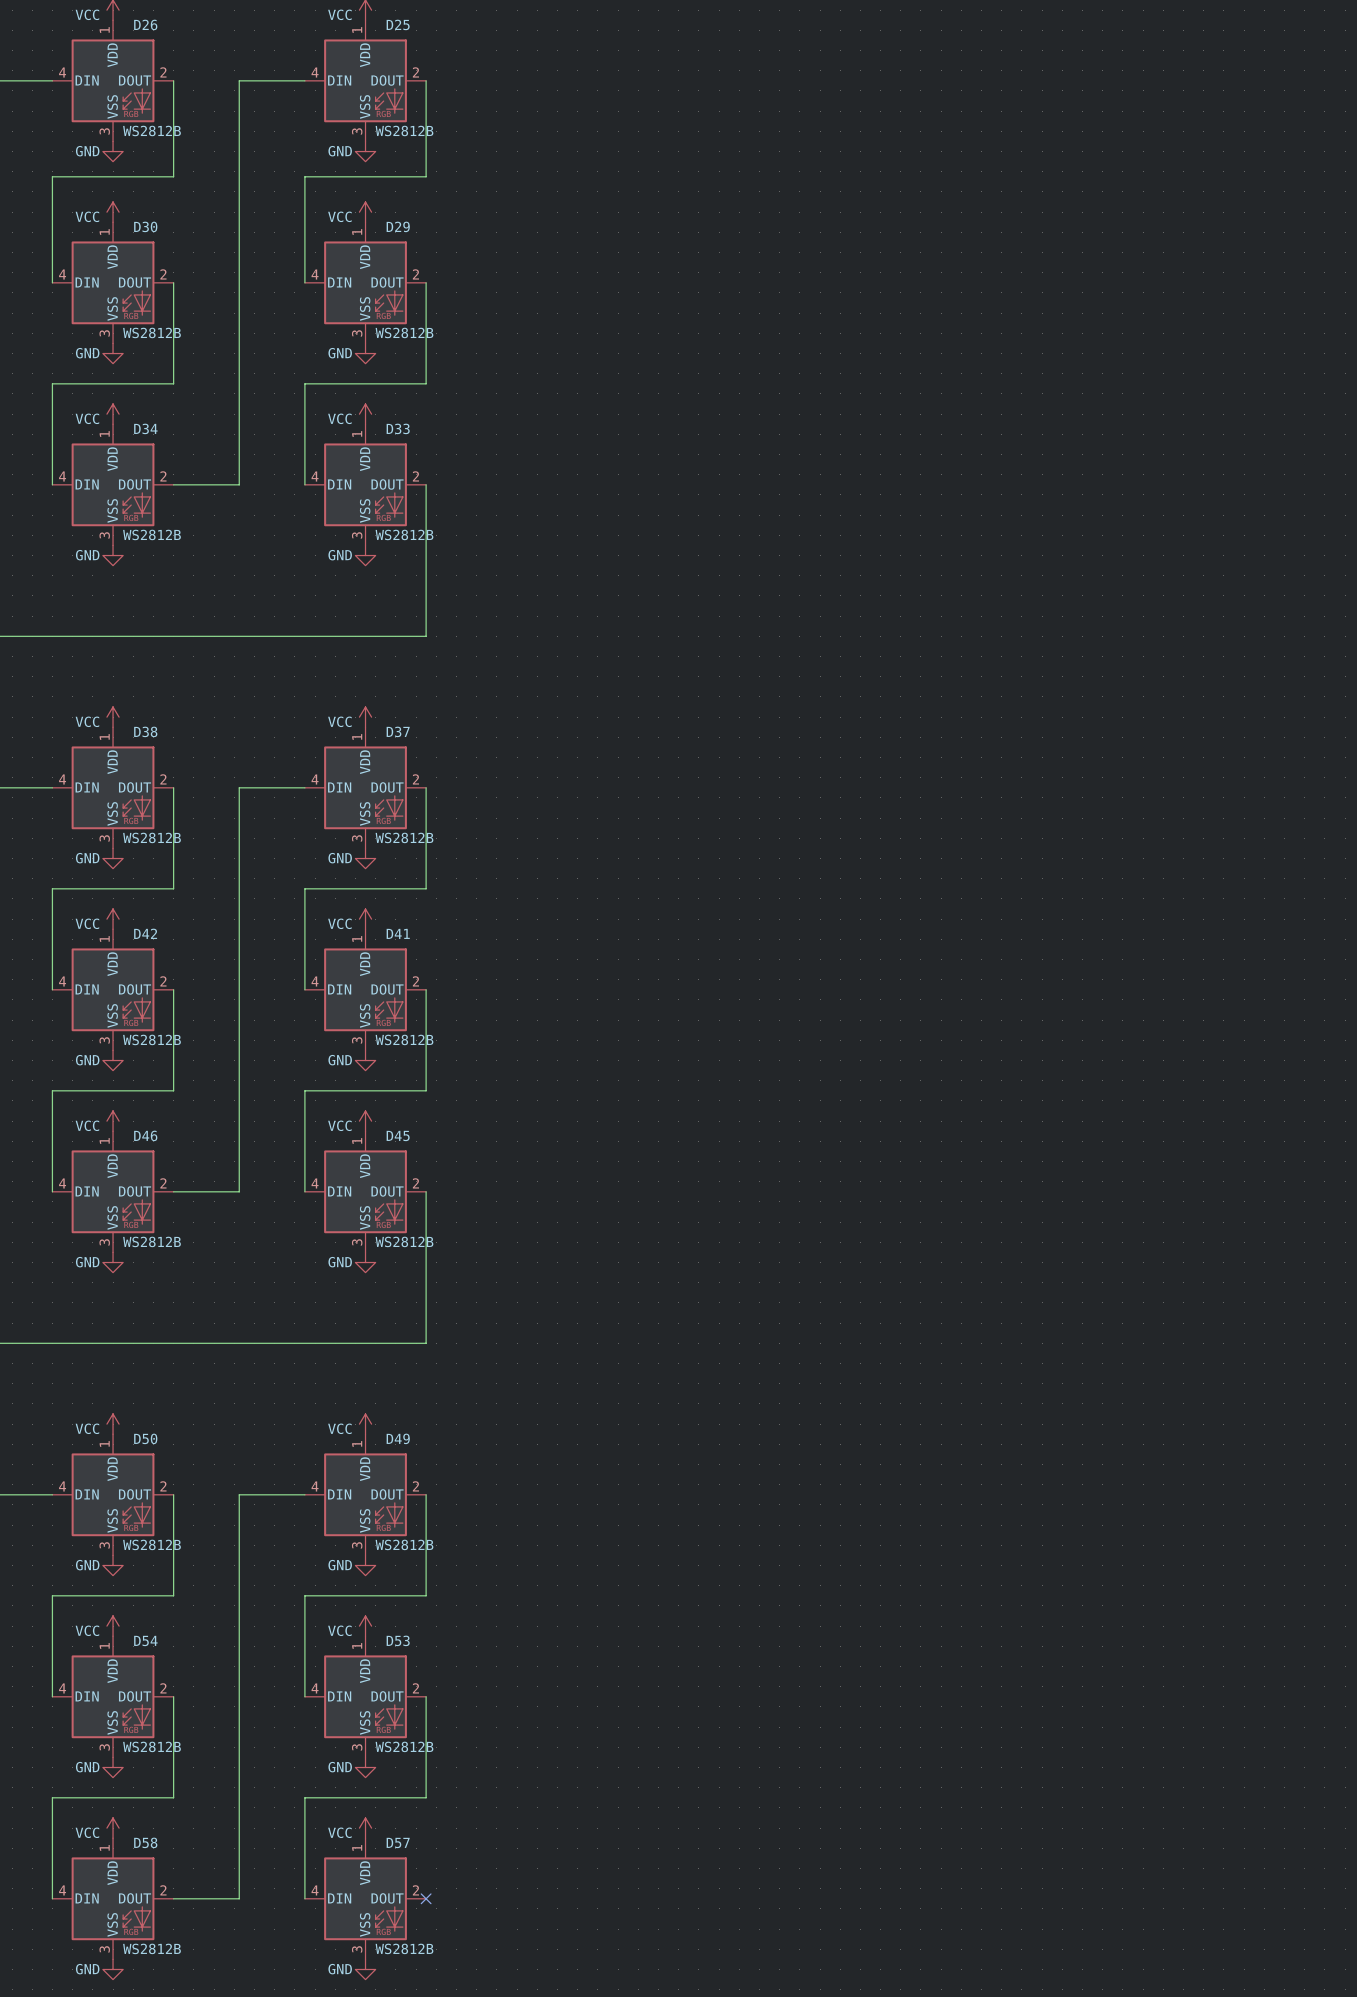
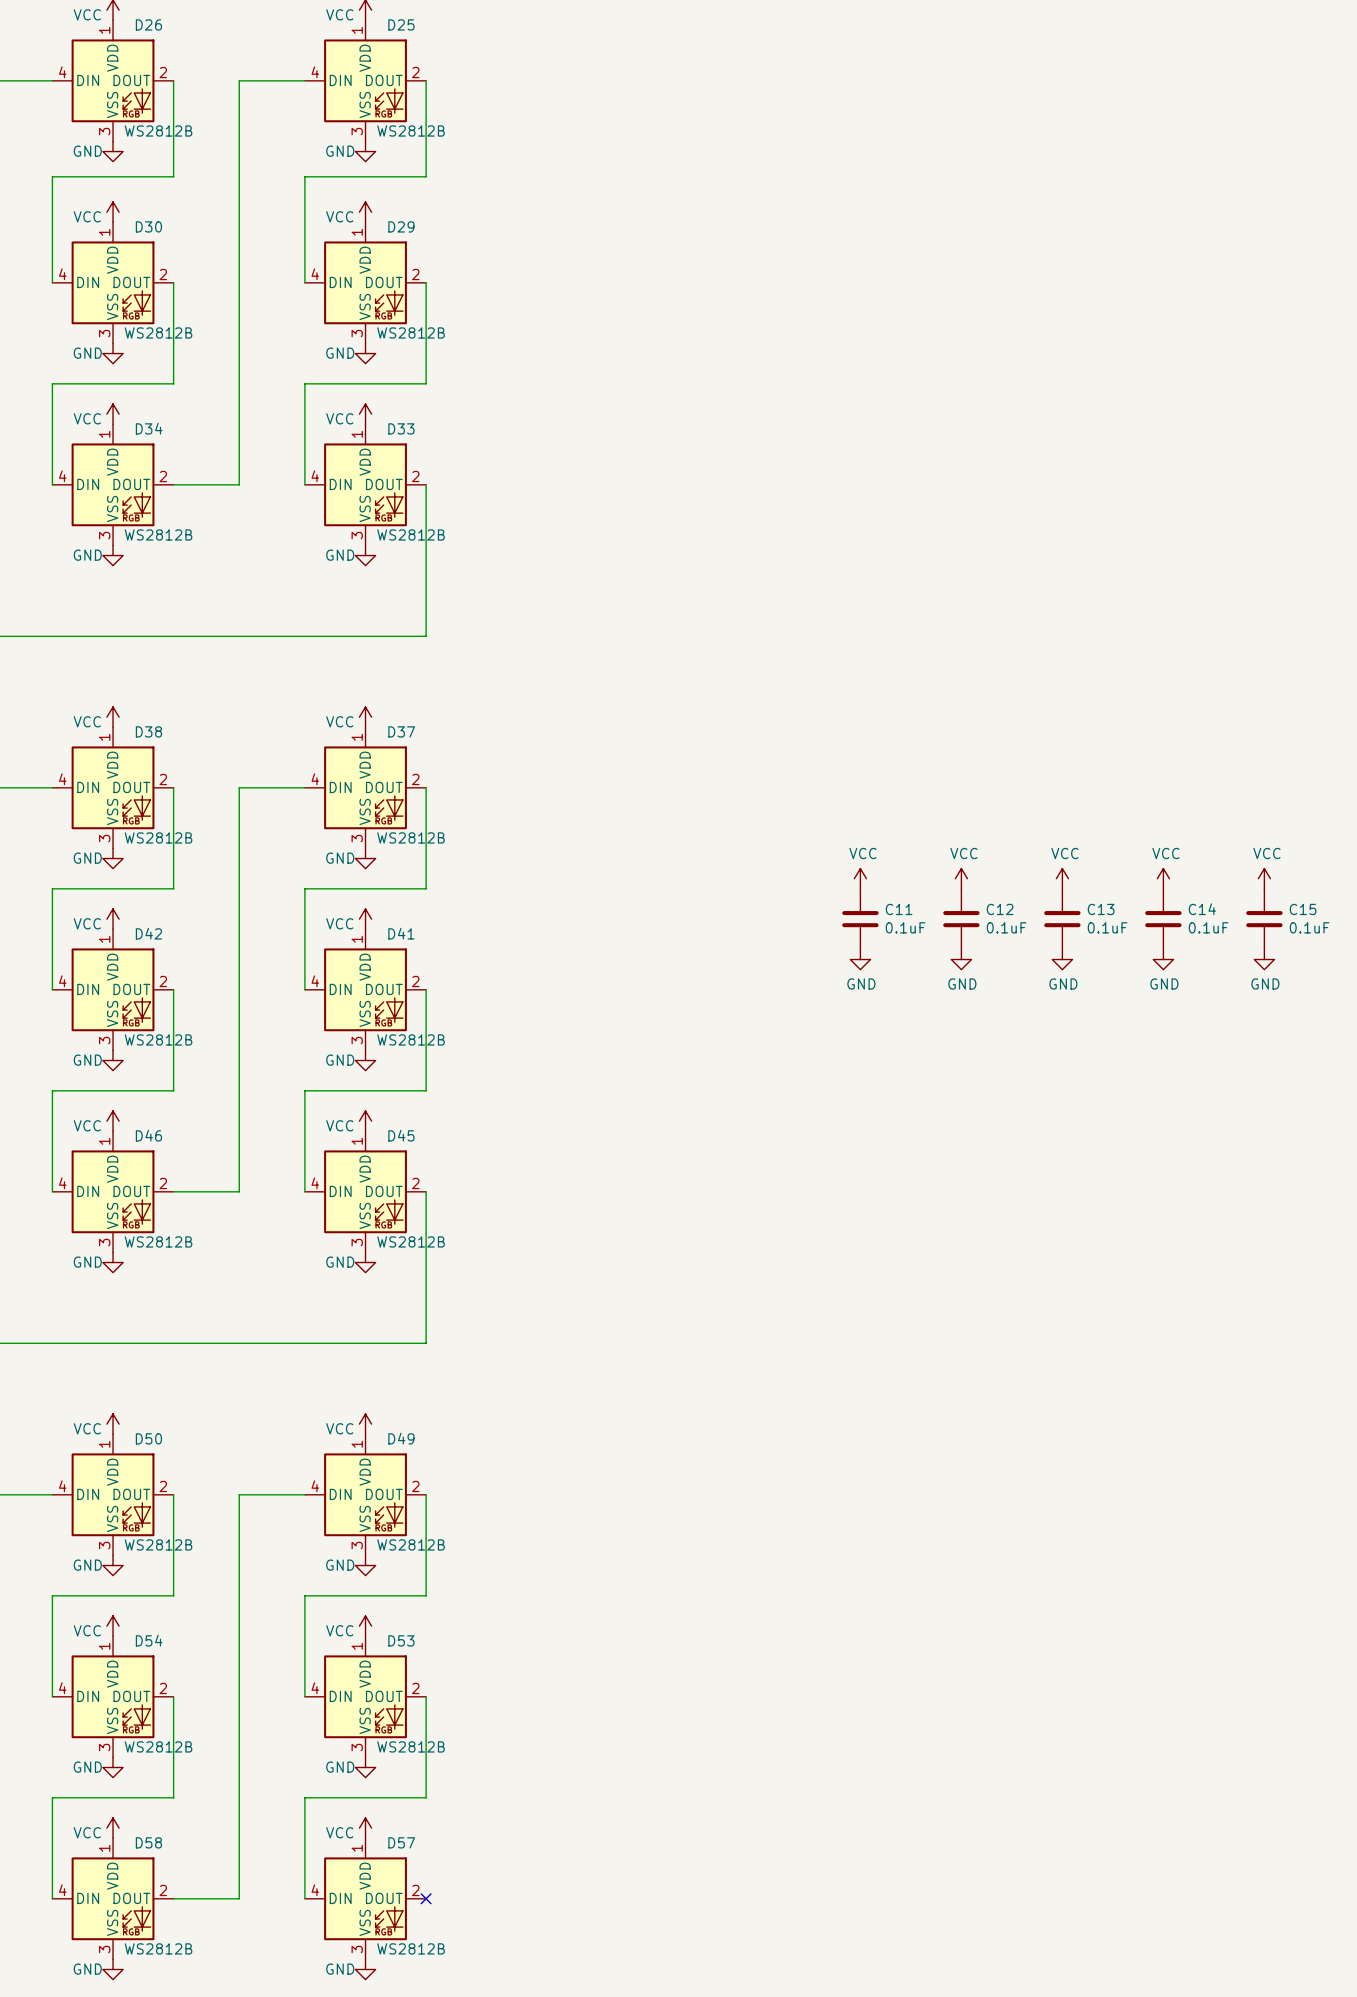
power symbol: none -> VCC (860, 878)
power symbol: none -> VCC (961, 878)
power symbol: none -> VCC (1062, 878)
power symbol: none -> VCC (1163, 878)
power symbol: none -> VCC (1264, 878)
C11: none -> 0.1uF (860, 919)
C12: none -> 0.1uF (961, 919)
C13: none -> 0.1uF (1062, 919)
C14: none -> 0.1uF (1163, 919)
C15: none -> 0.1uF (1264, 919)
power symbol: none -> GND (860, 959)
power symbol: none -> GND (961, 959)
power symbol: none -> GND (1062, 959)
power symbol: none -> GND (1163, 959)
power symbol: none -> GND (1264, 959)

